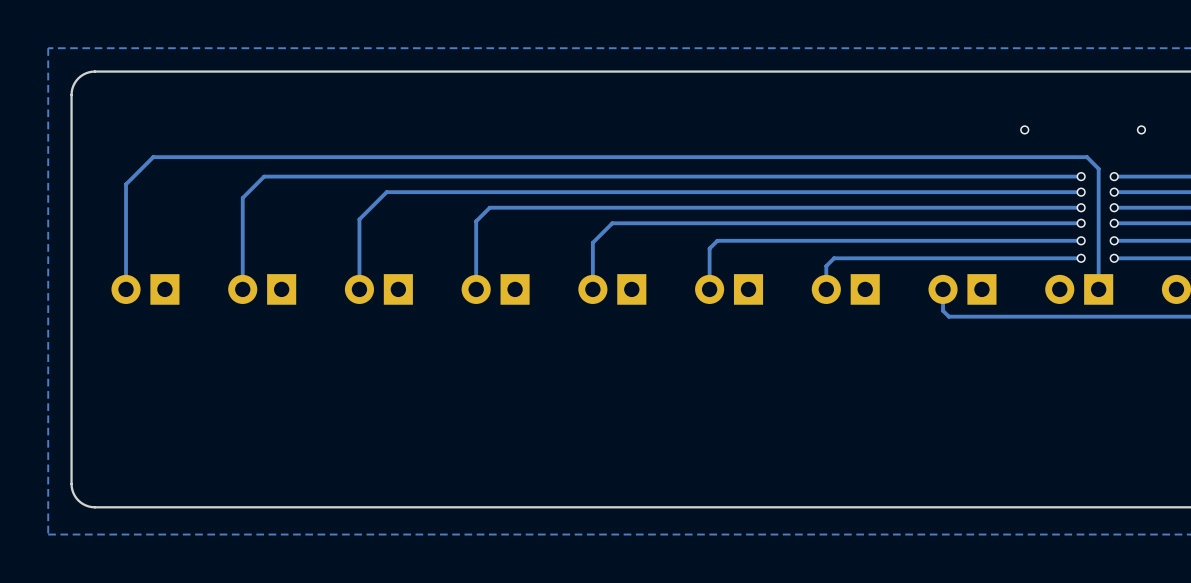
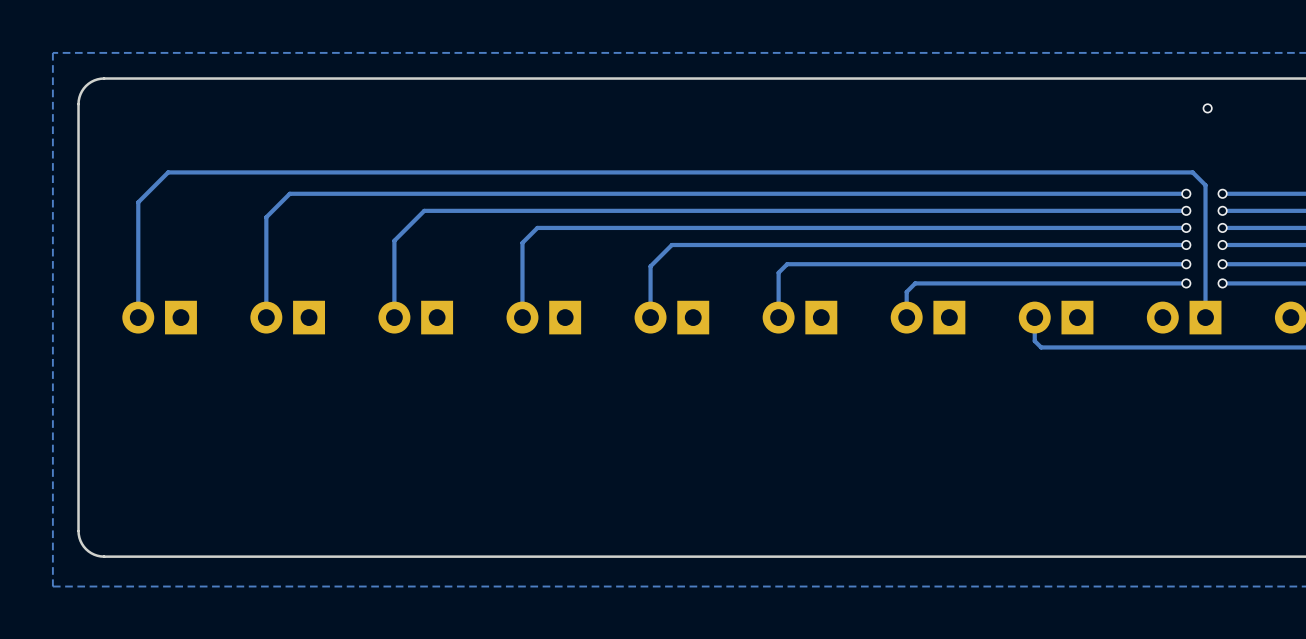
via: none -> (1207, 108)
via: (1024, 129) -> none
via: (1141, 129) -> none

